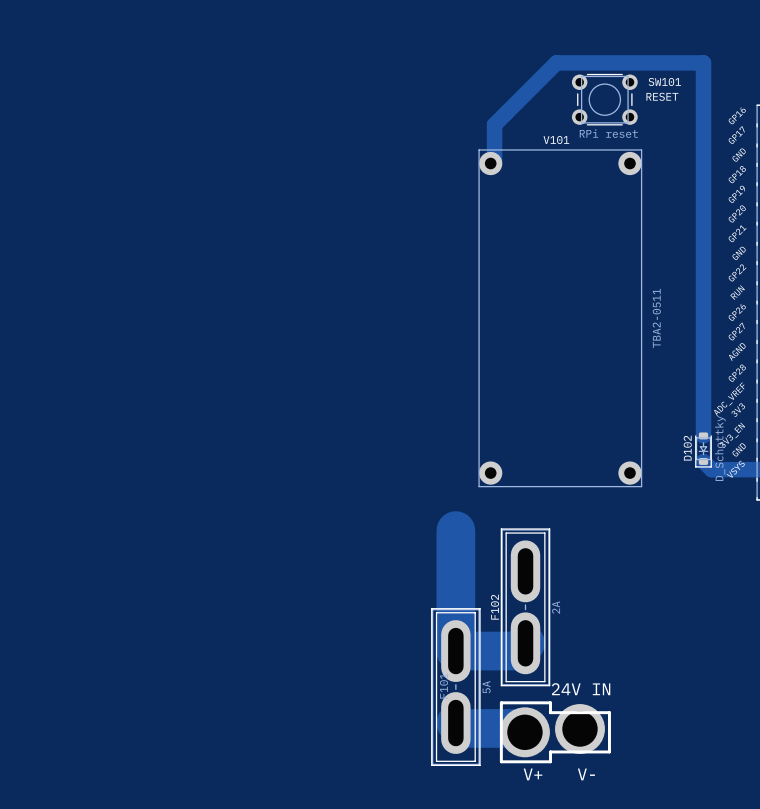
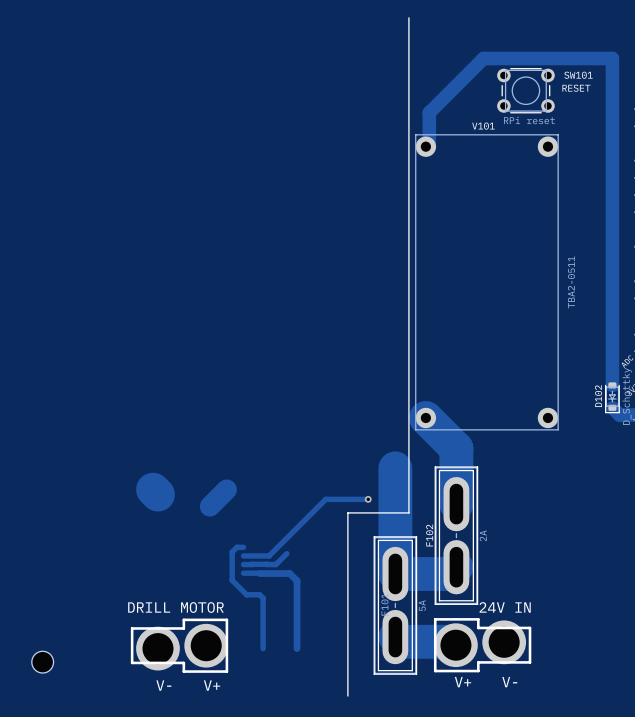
line: none -> (408, 17) (408, 512) (347, 512) (347, 696)
track: none -> (425, 417) (456, 448) (456, 504)
track: none -> (153, 489) (157, 494)
track: none -> (226, 489) (209, 506)
track: none -> (368, 499) (325, 499) (269, 555) (243, 555)
via: none -> (368, 499)
track: none -> (243, 547) (236, 547) (232, 552) (232, 580) (246, 594) (259, 594) (263, 598) (263, 648)
track: none -> (286, 553) (275, 564) (243, 564)
track: none -> (243, 573) (289, 573) (297, 580) (297, 648)
part: none -> DRILL MOTOR (179, 645)
part: none -> (42, 662)

